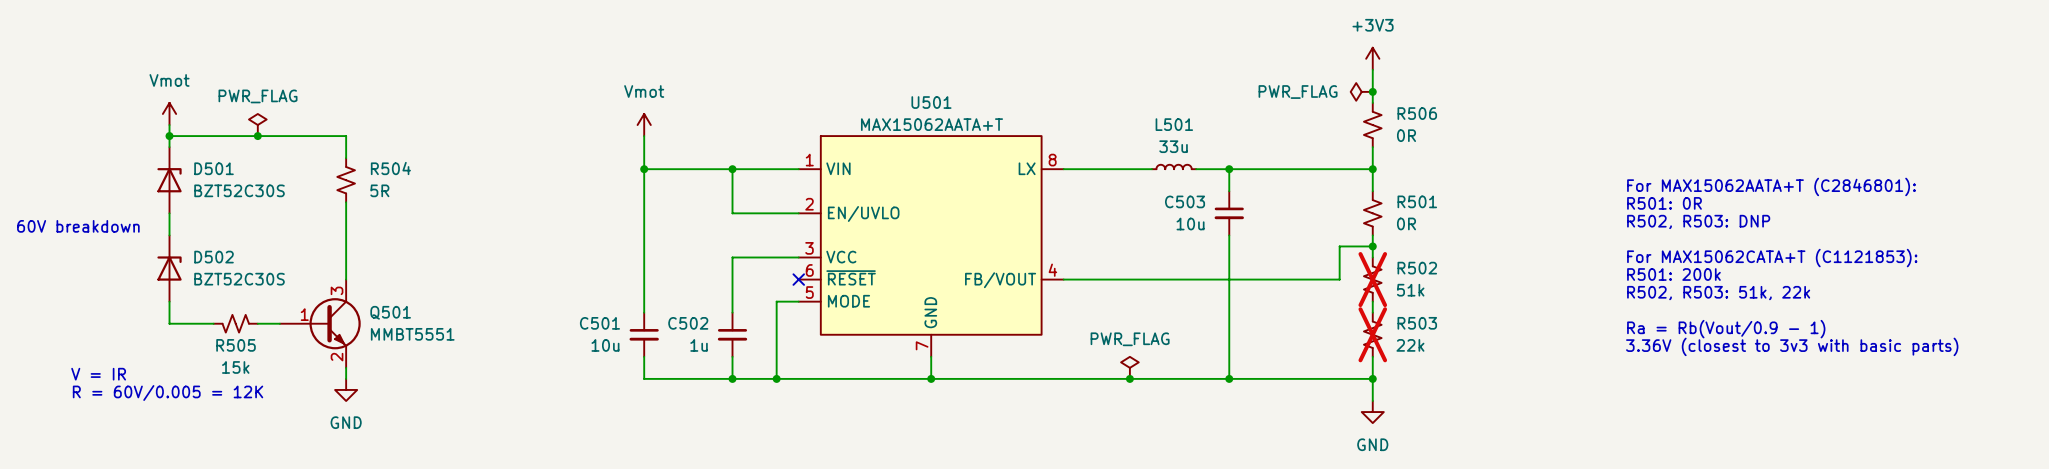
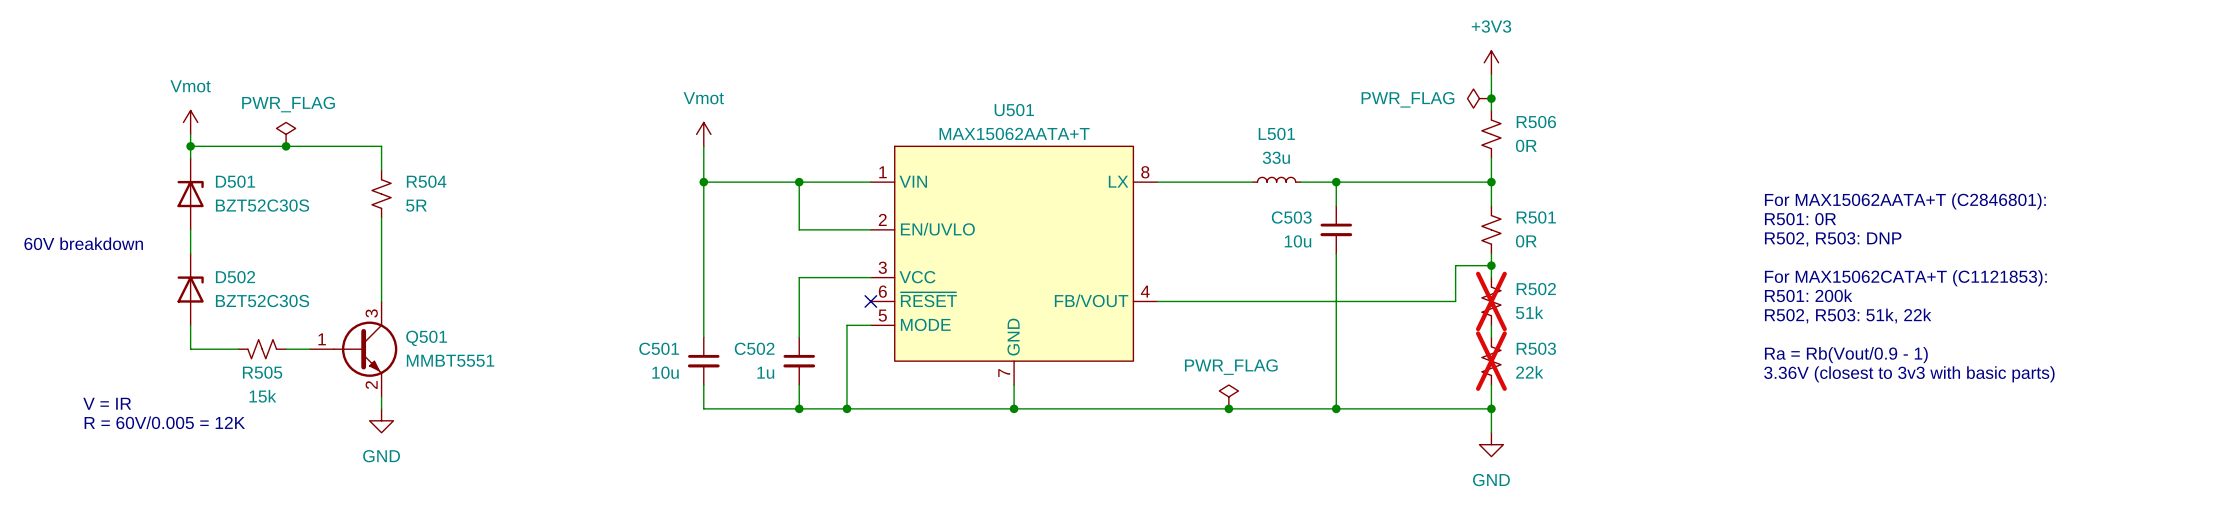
Q501 symbol: [279, 279, 361, 368] -> [309, 301, 398, 397]

